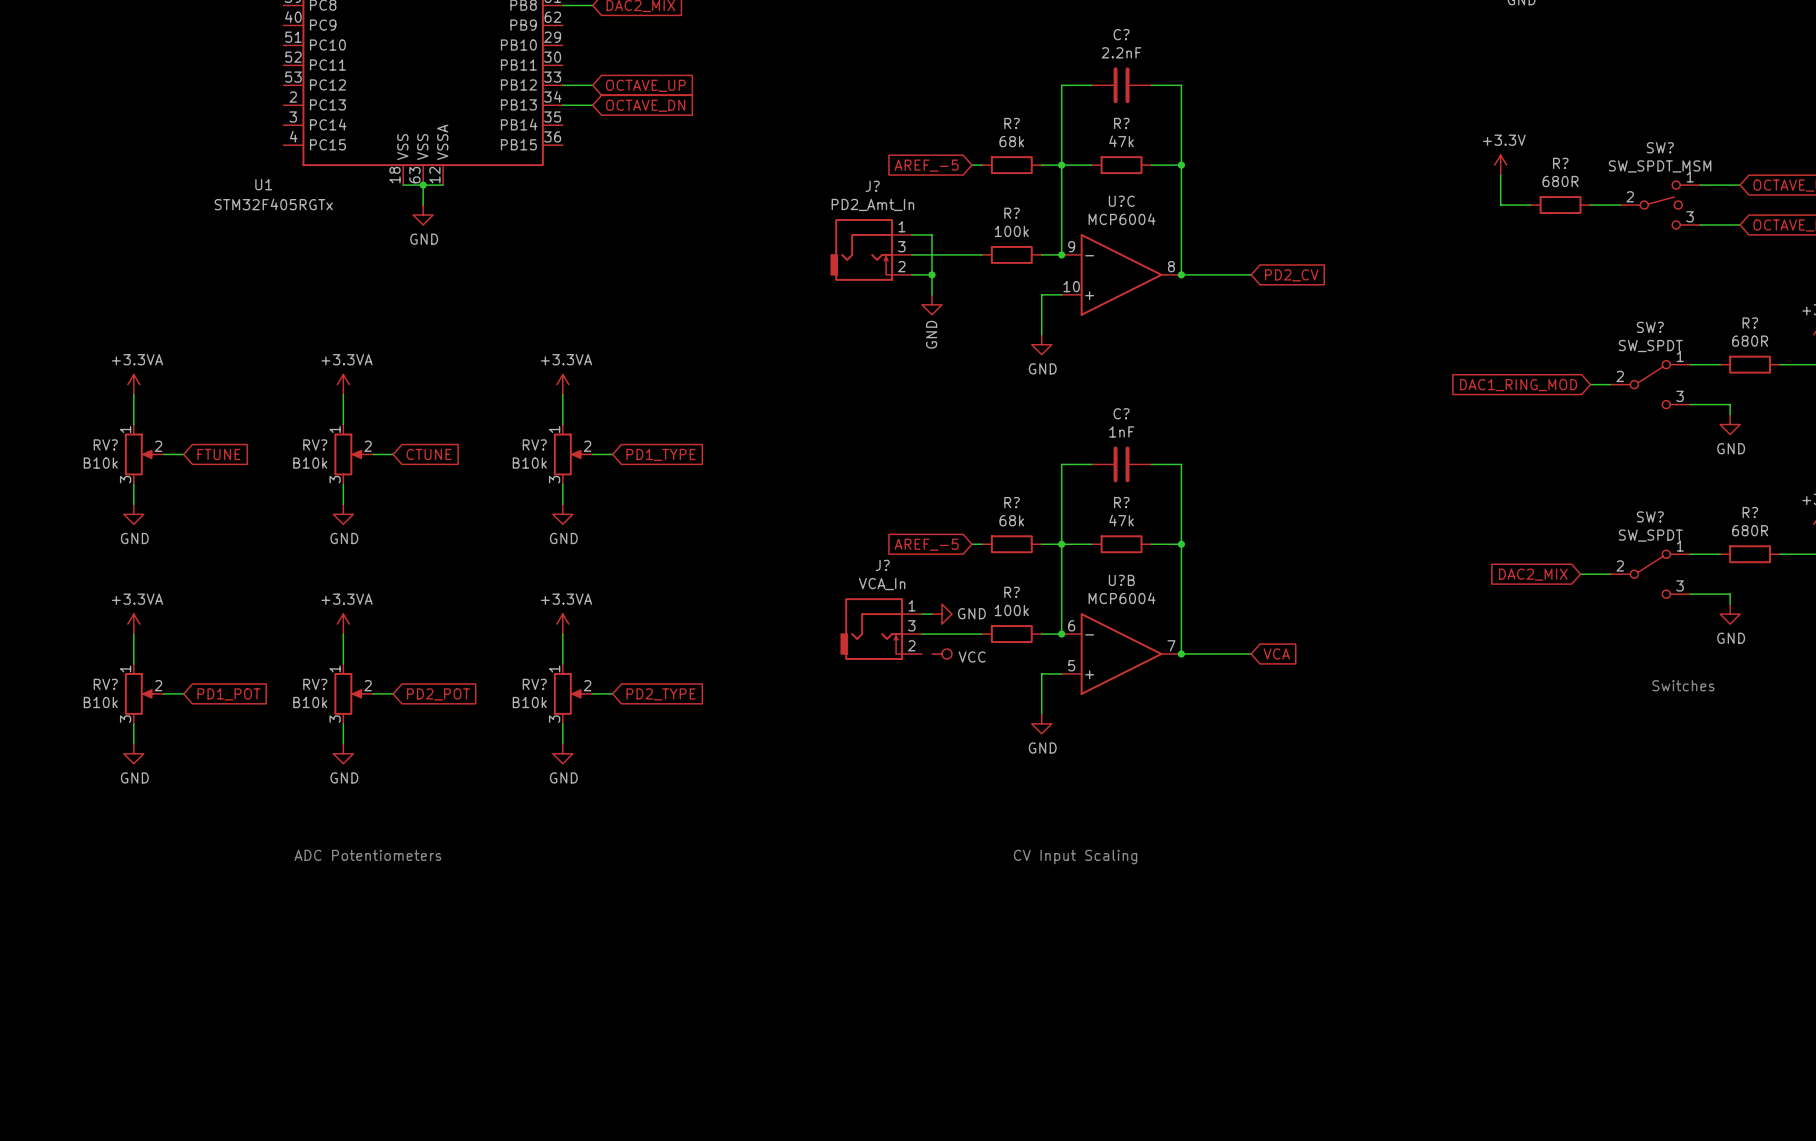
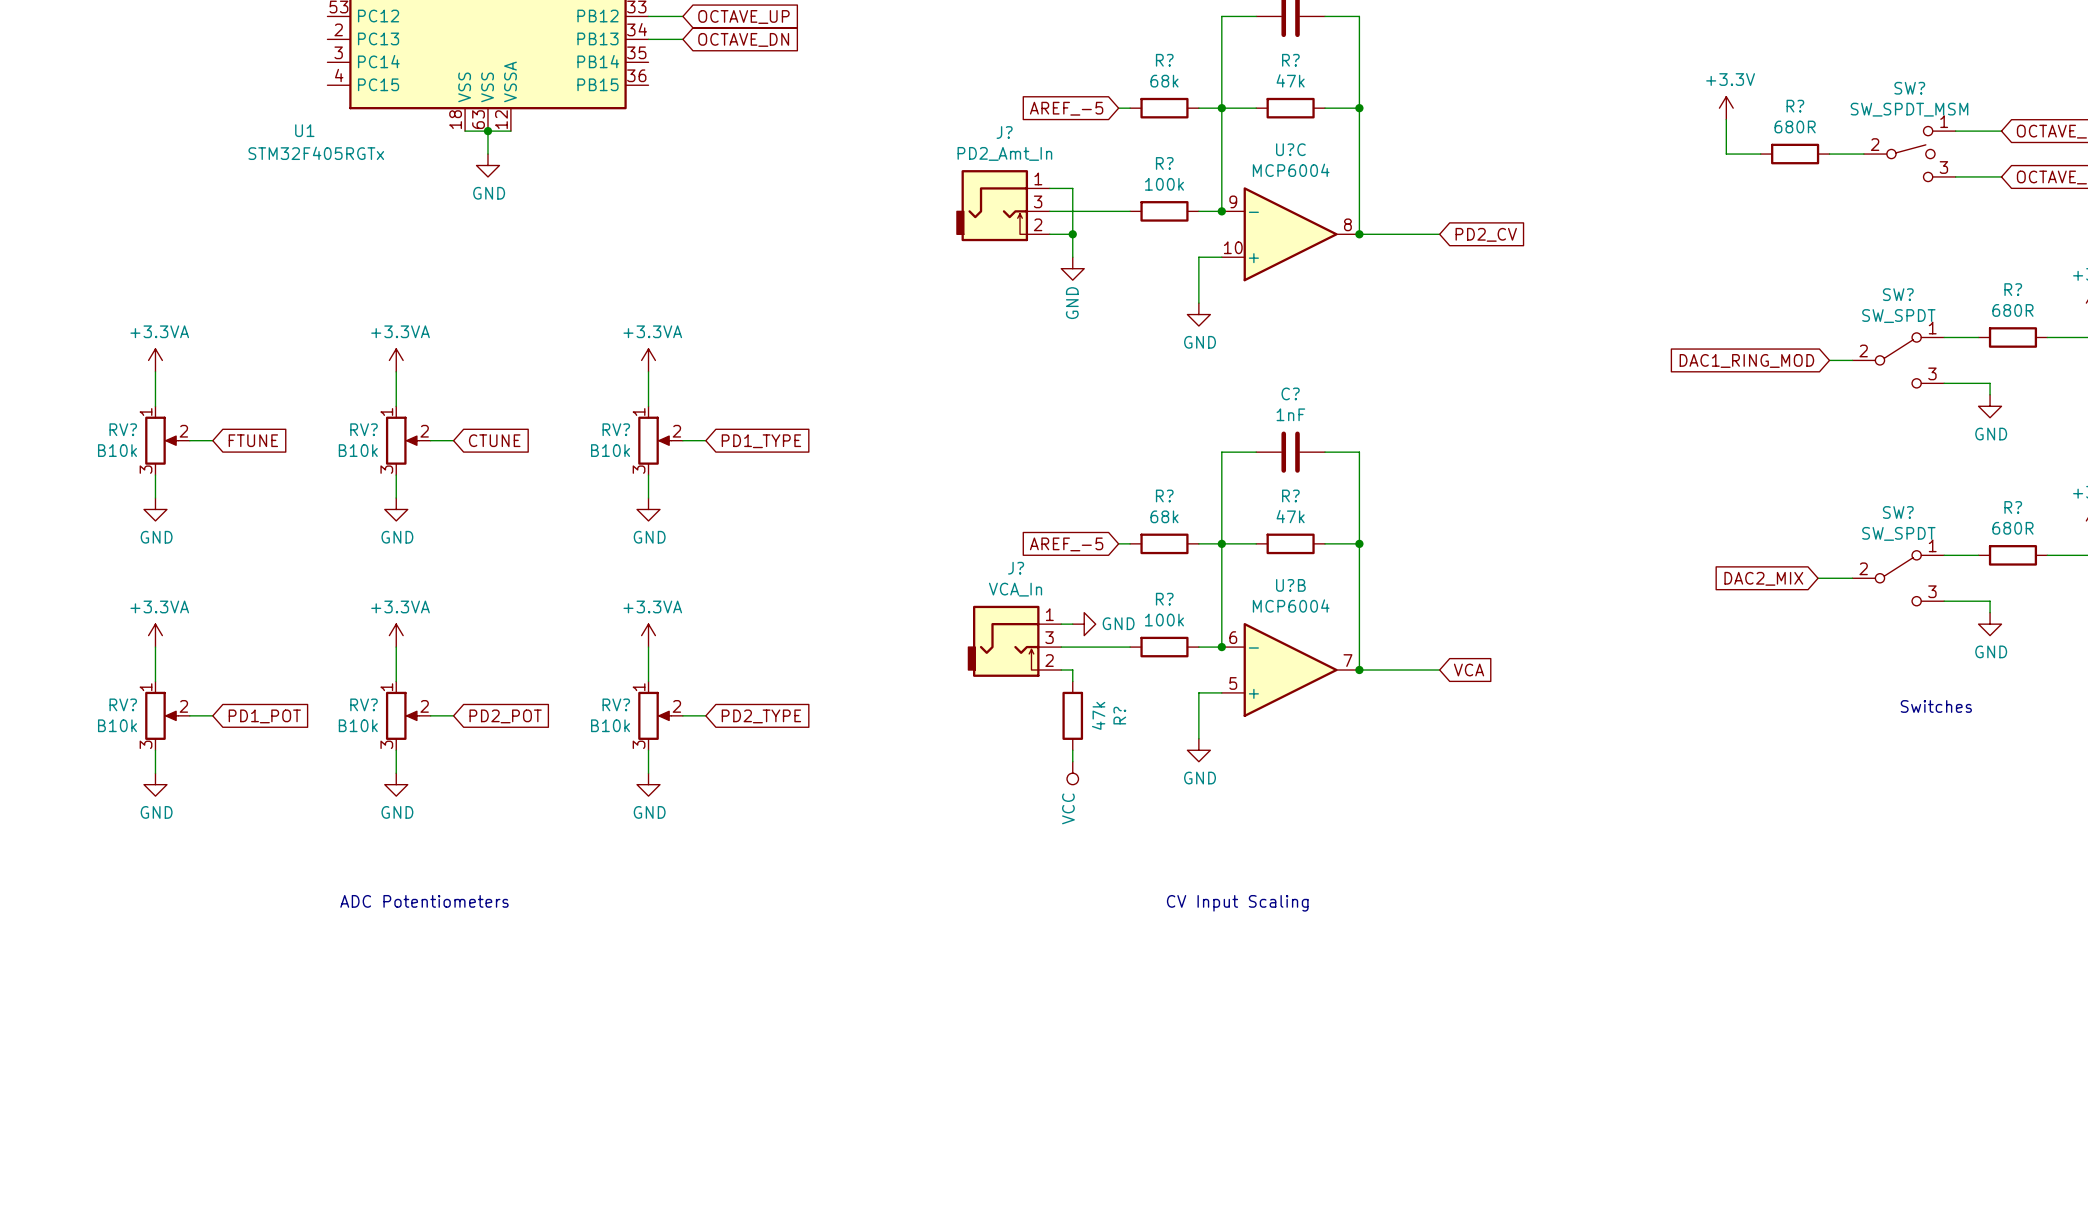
wire: none -> (1061, 670) (1072, 670) (1072, 681)
power symbol rotation: 0° (941, 654) -> 90° clockwise (1072, 773)
power symbol position: VCC (941, 654) -> VCC (1072, 773)
R?: none -> 47k (1072, 715)
wire: none -> (1072, 750) (1072, 761)

